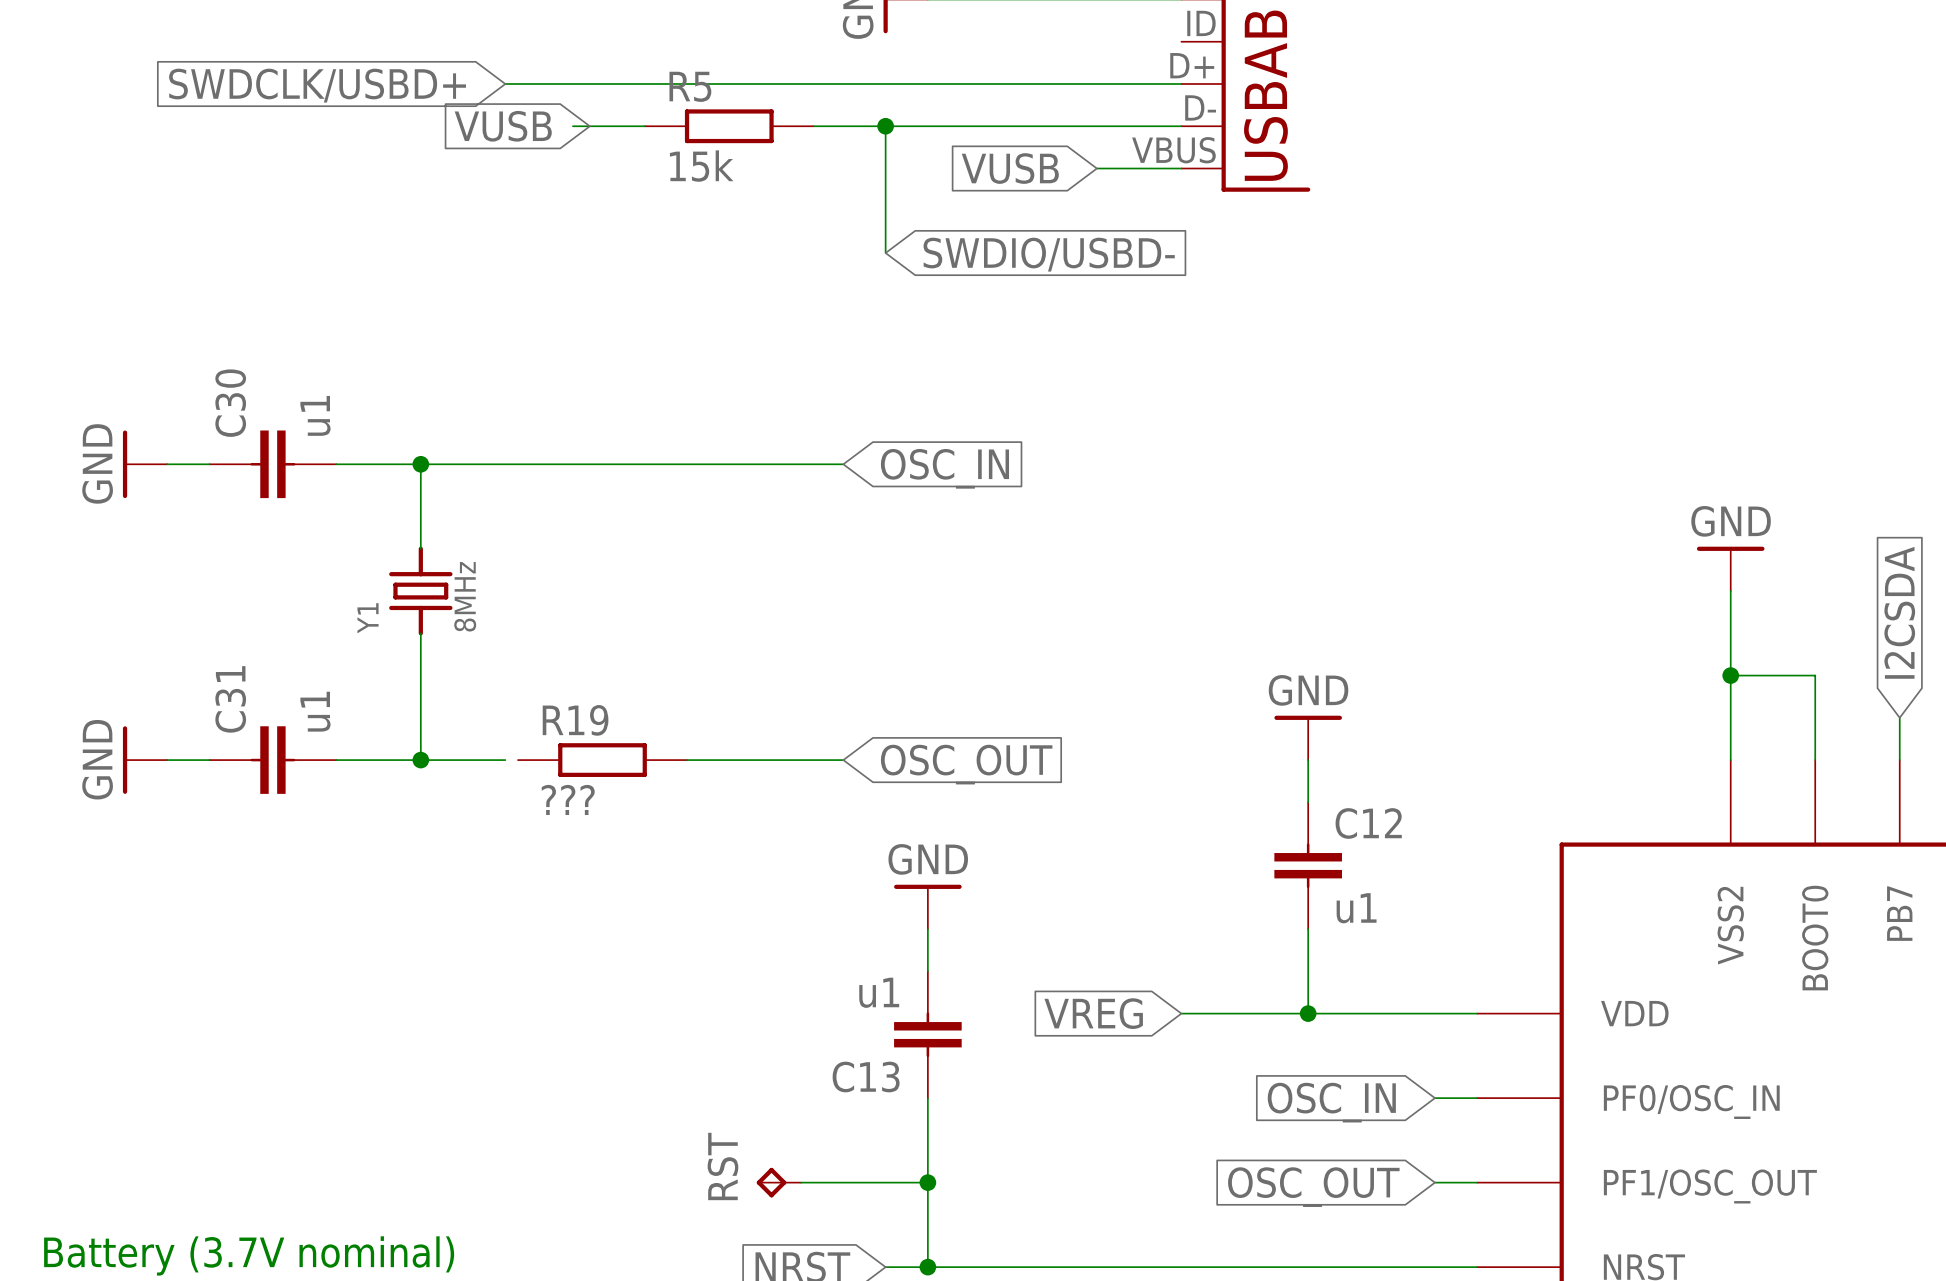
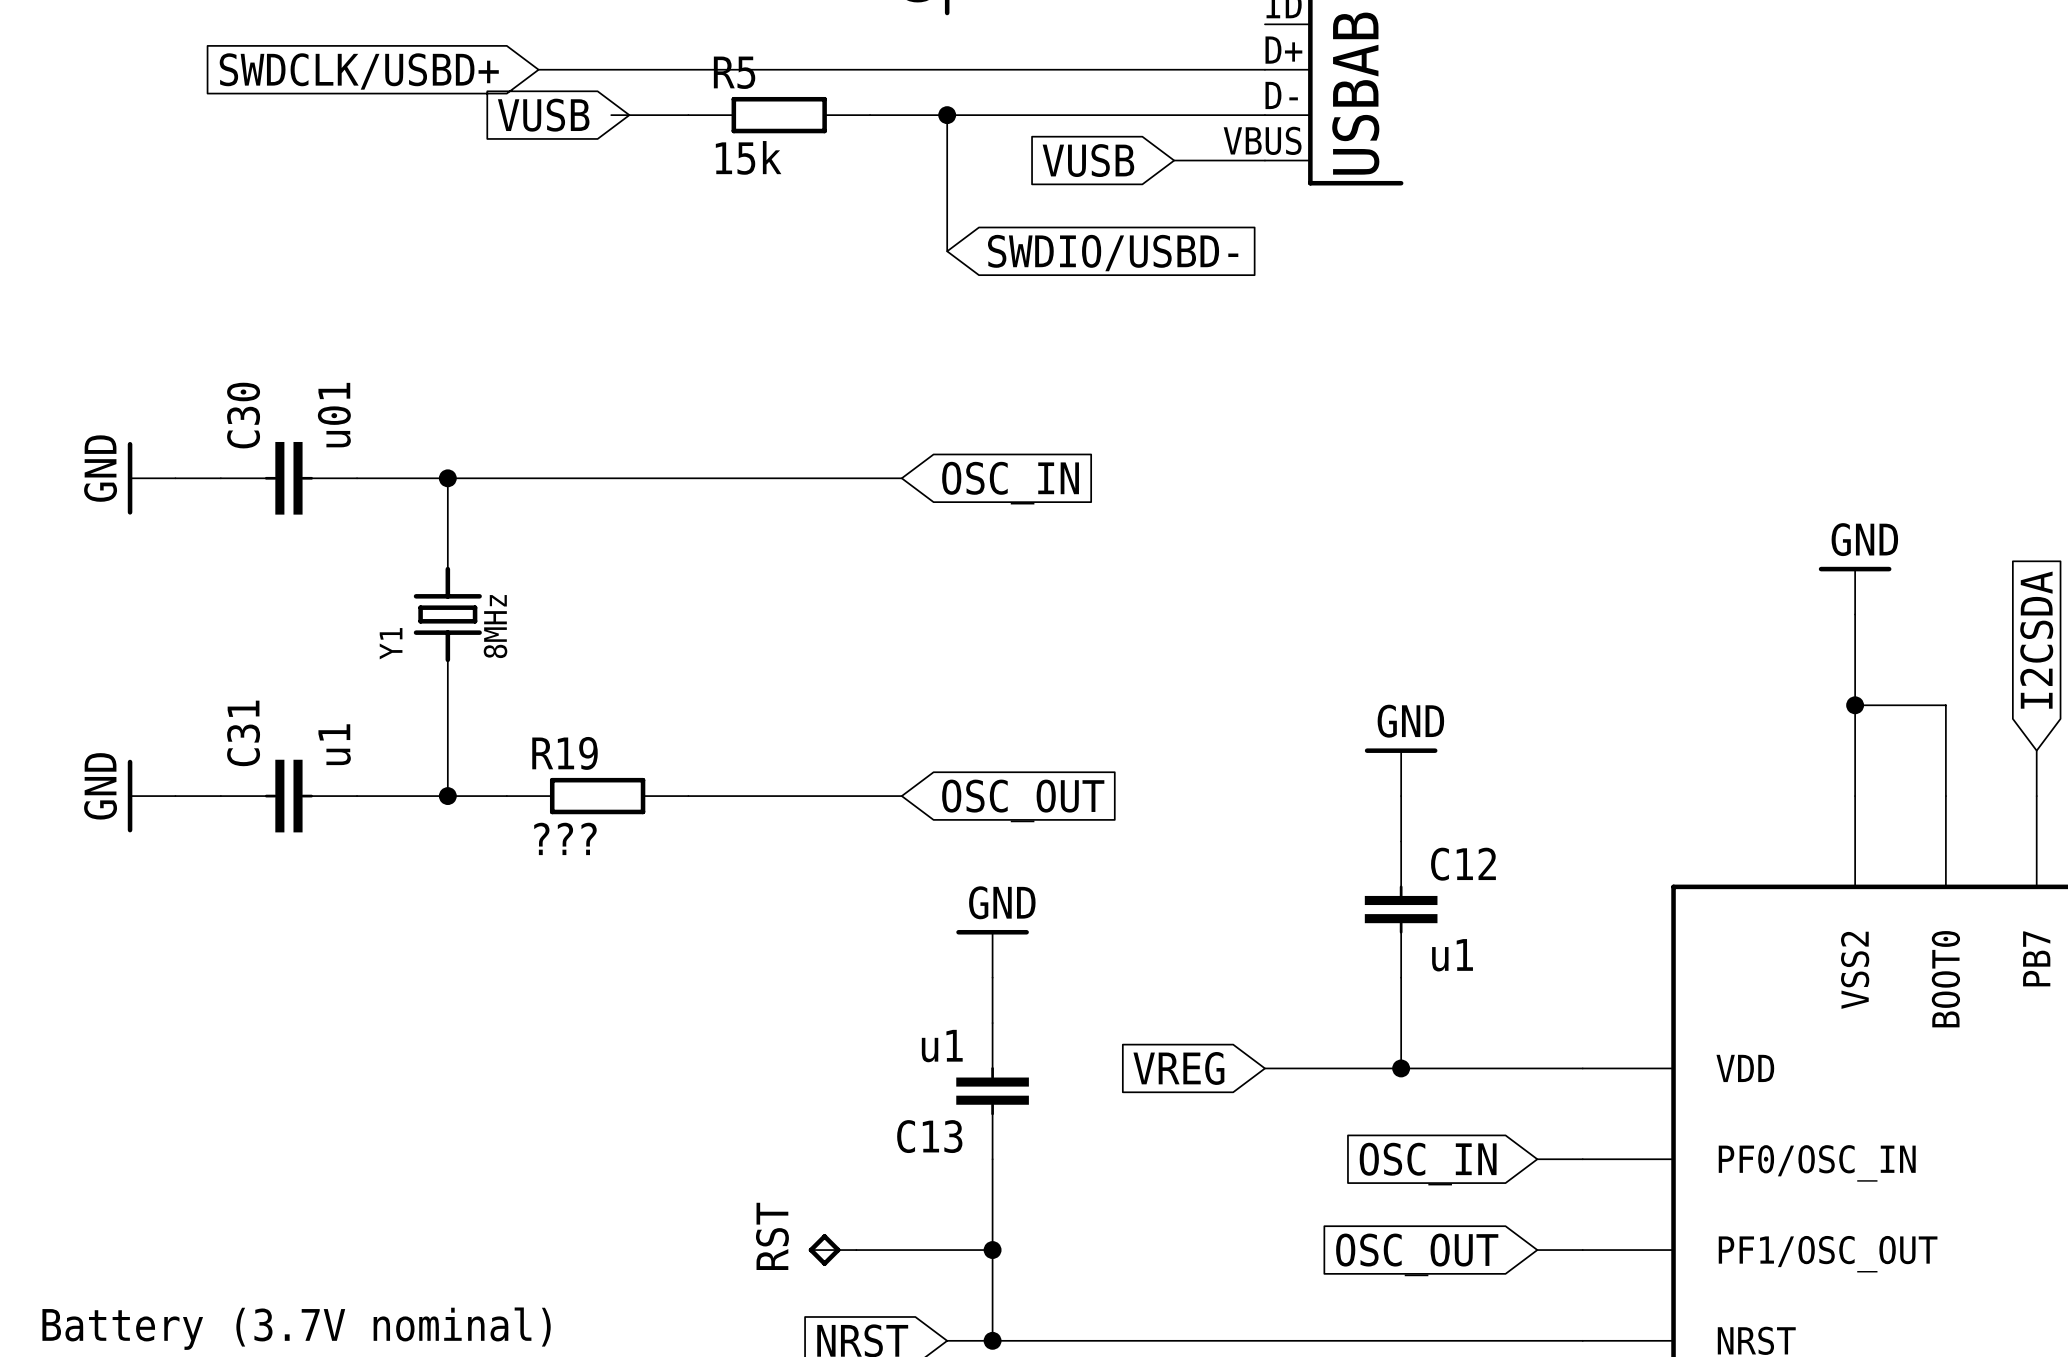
C30 value: u1 (315, 415) -> u01 (334, 415)
R19 position: (602, 760) -> (597, 796)

